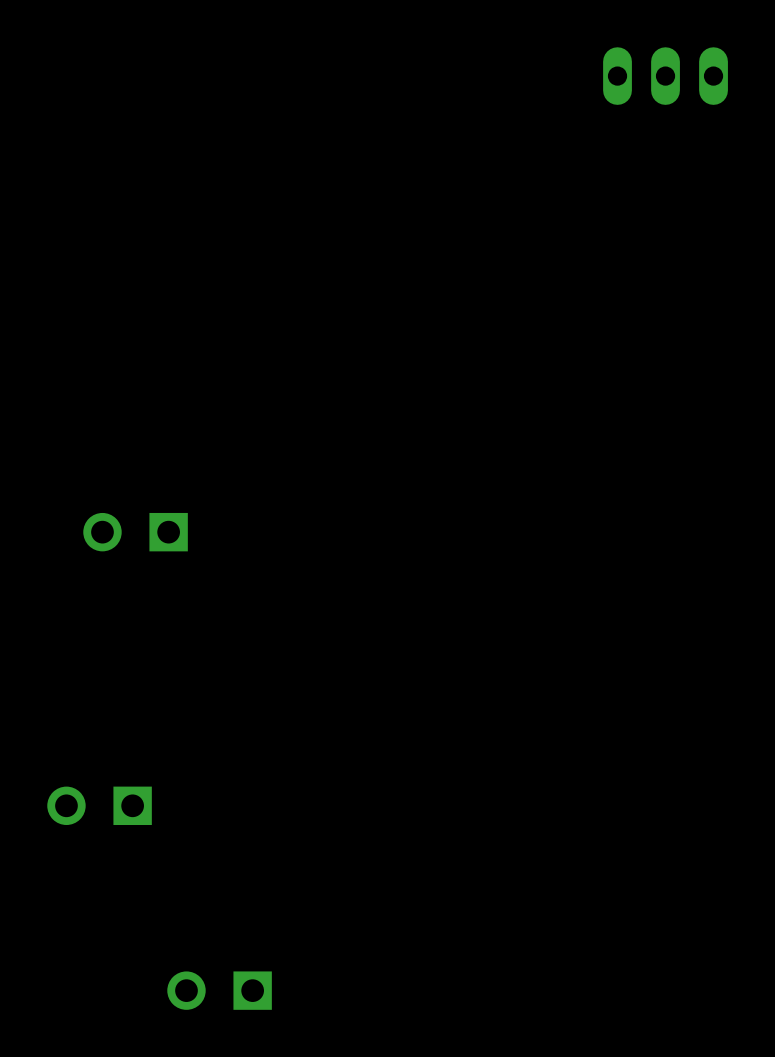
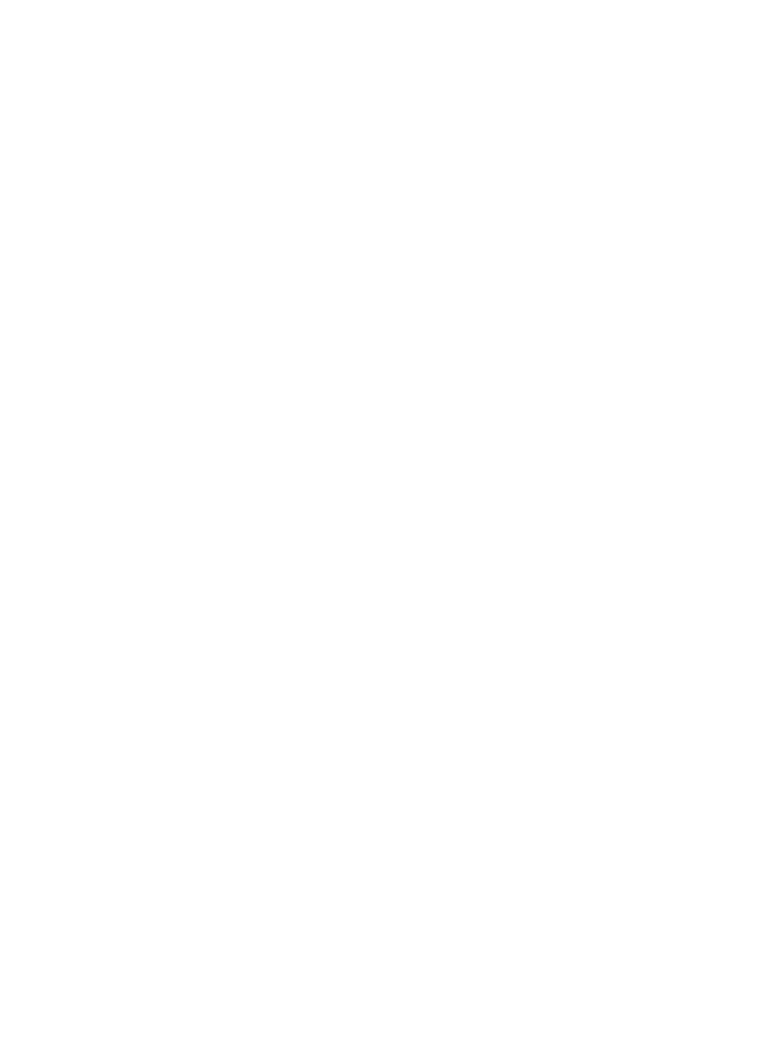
part: (665, 76) -> none
part: (135, 532) -> none
part: (99, 805) -> none
part: (219, 990) -> none

